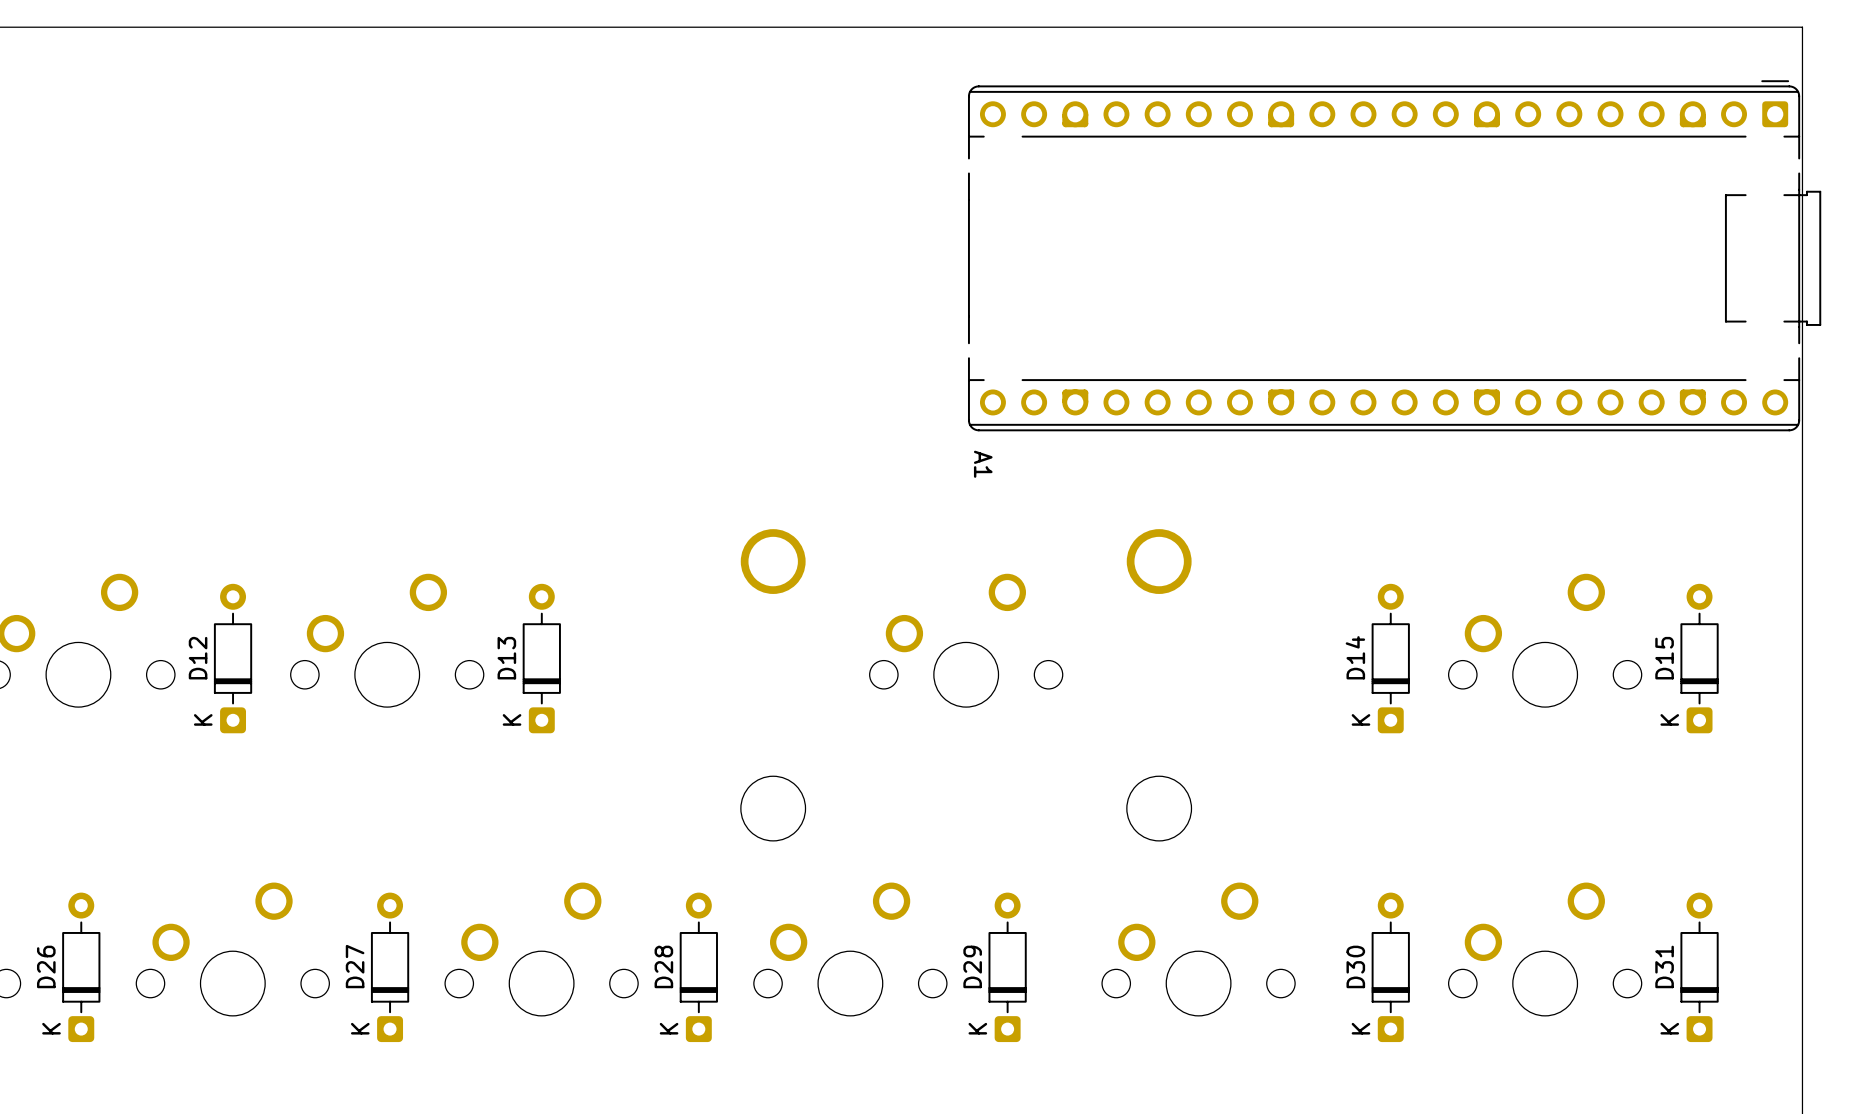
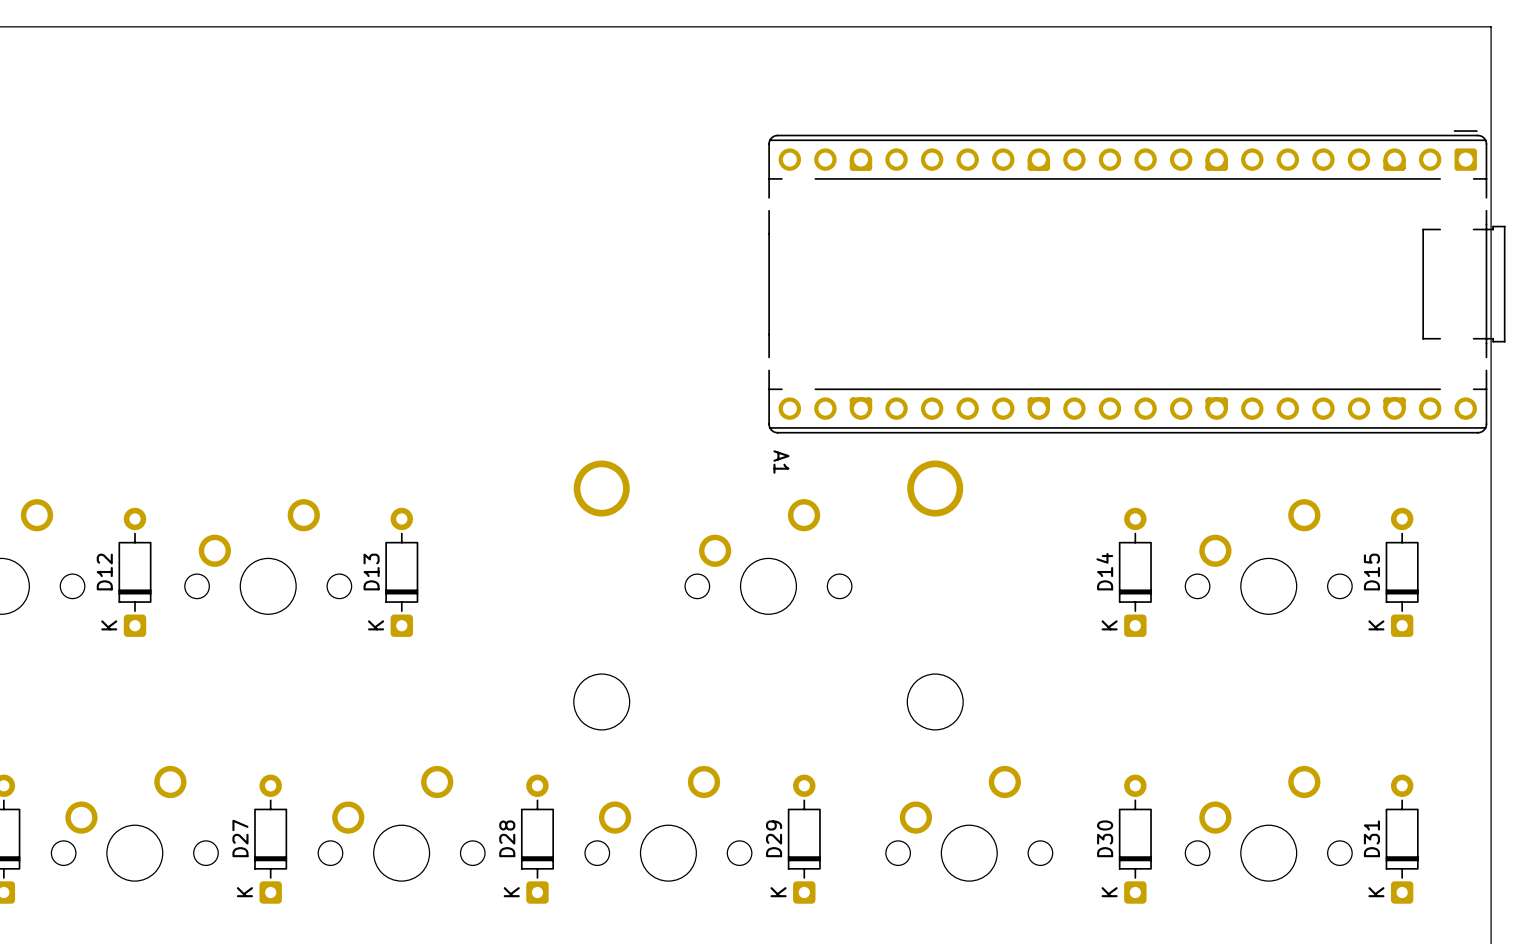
A1 footprint: [967, 80, 1822, 432] -> [768, 130, 1506, 434]

